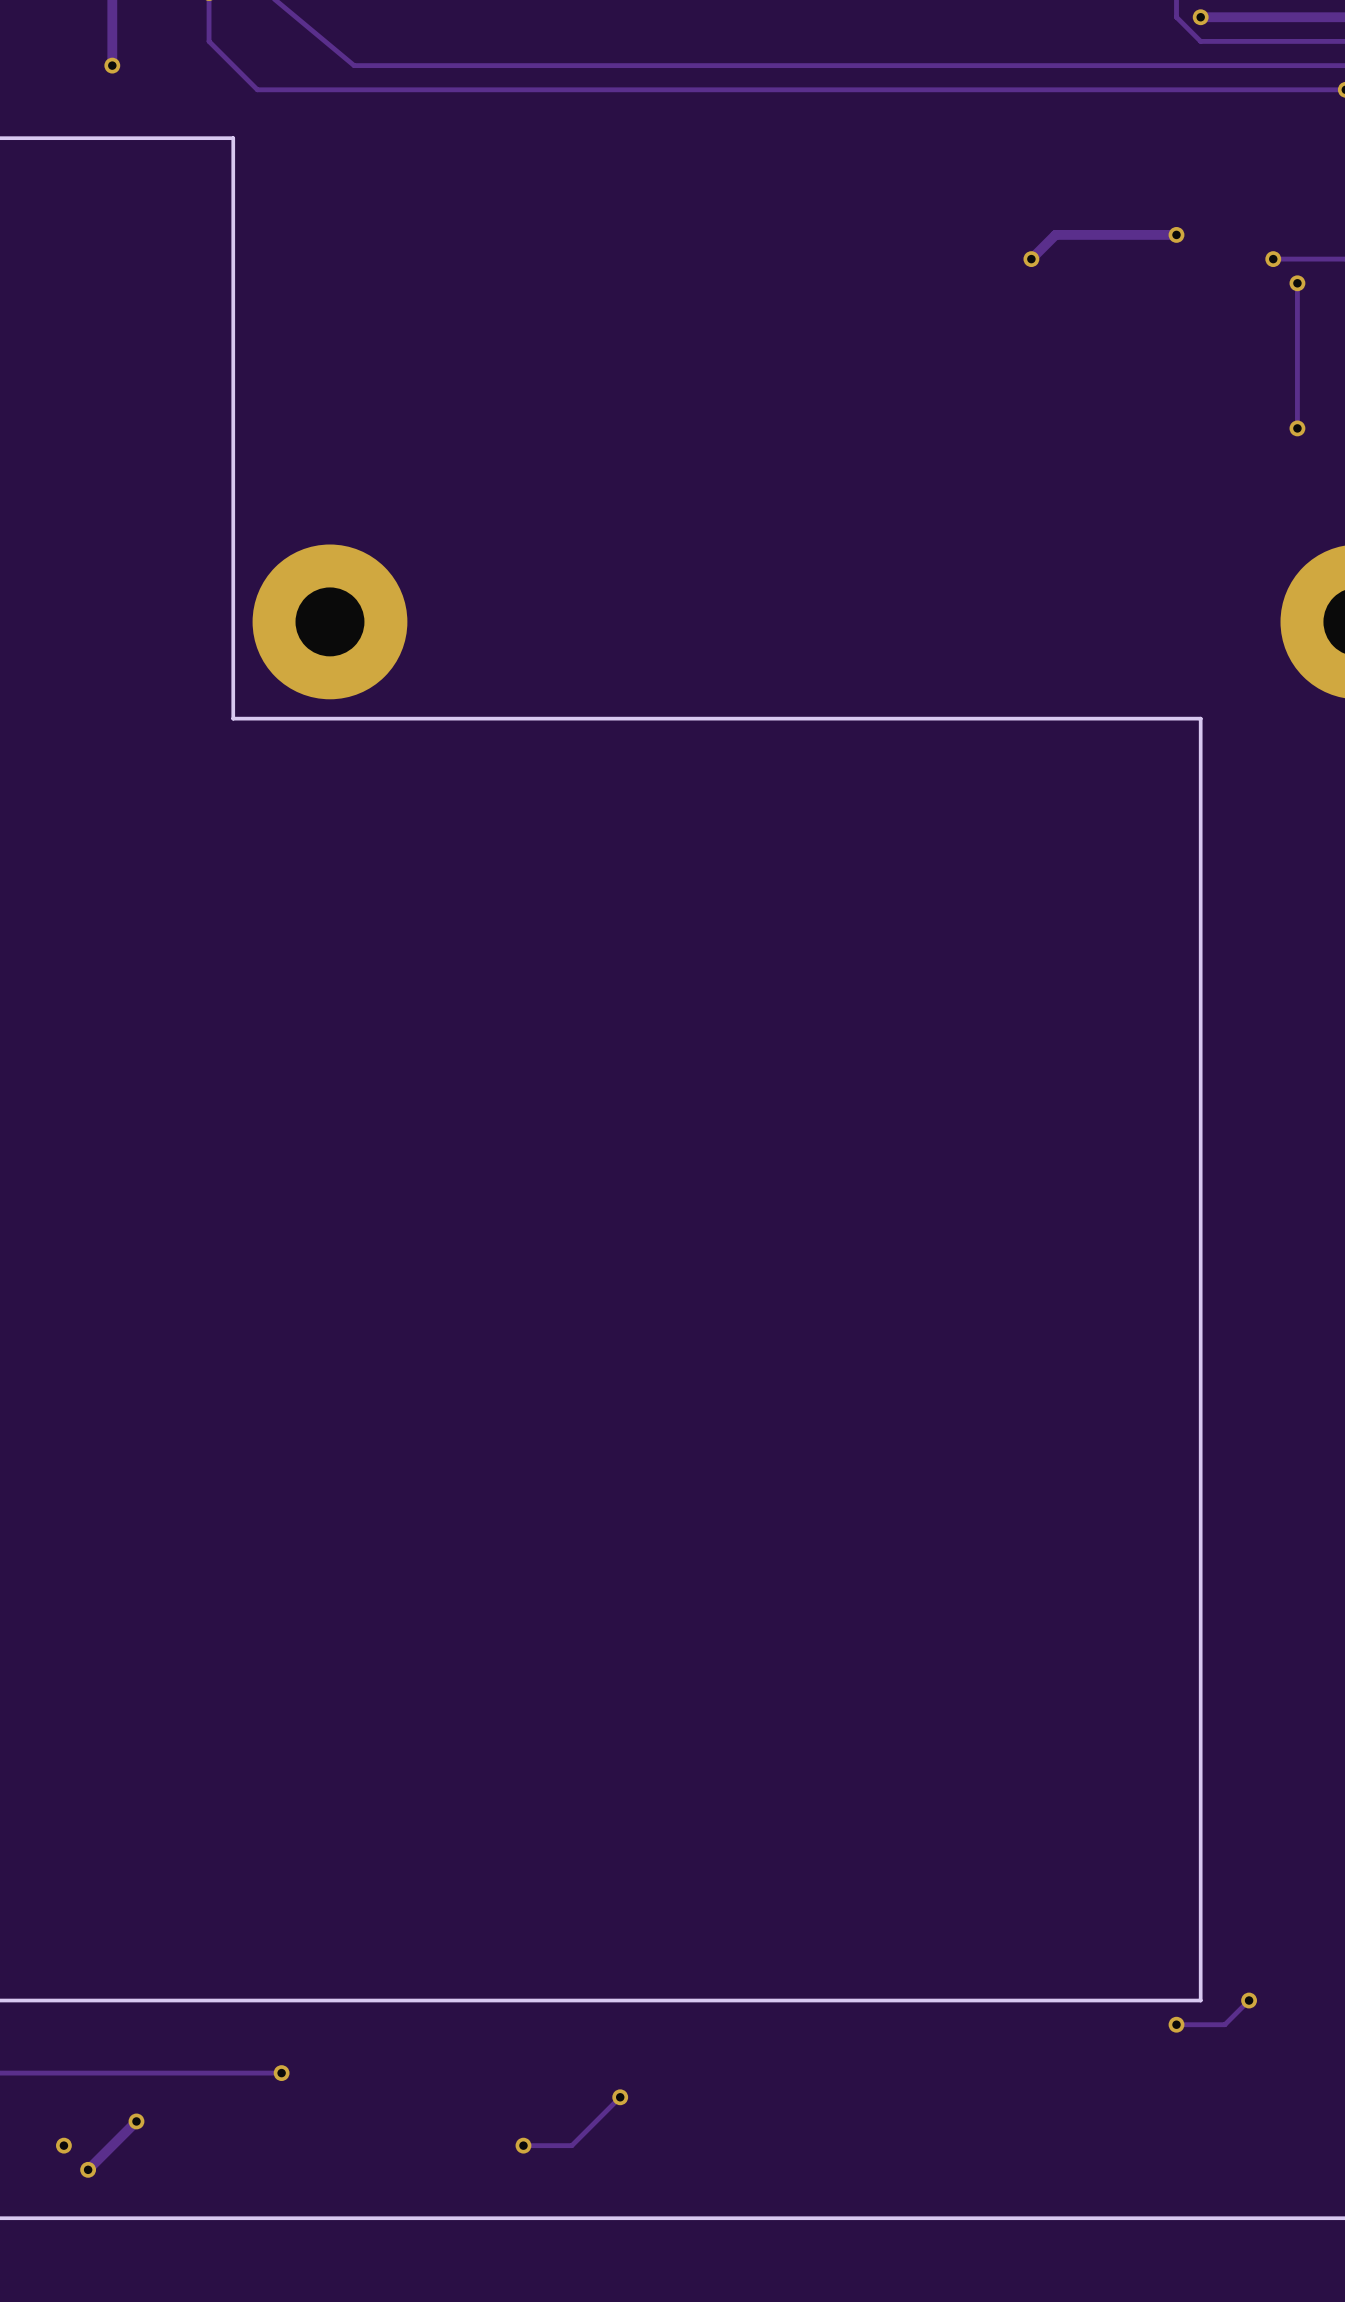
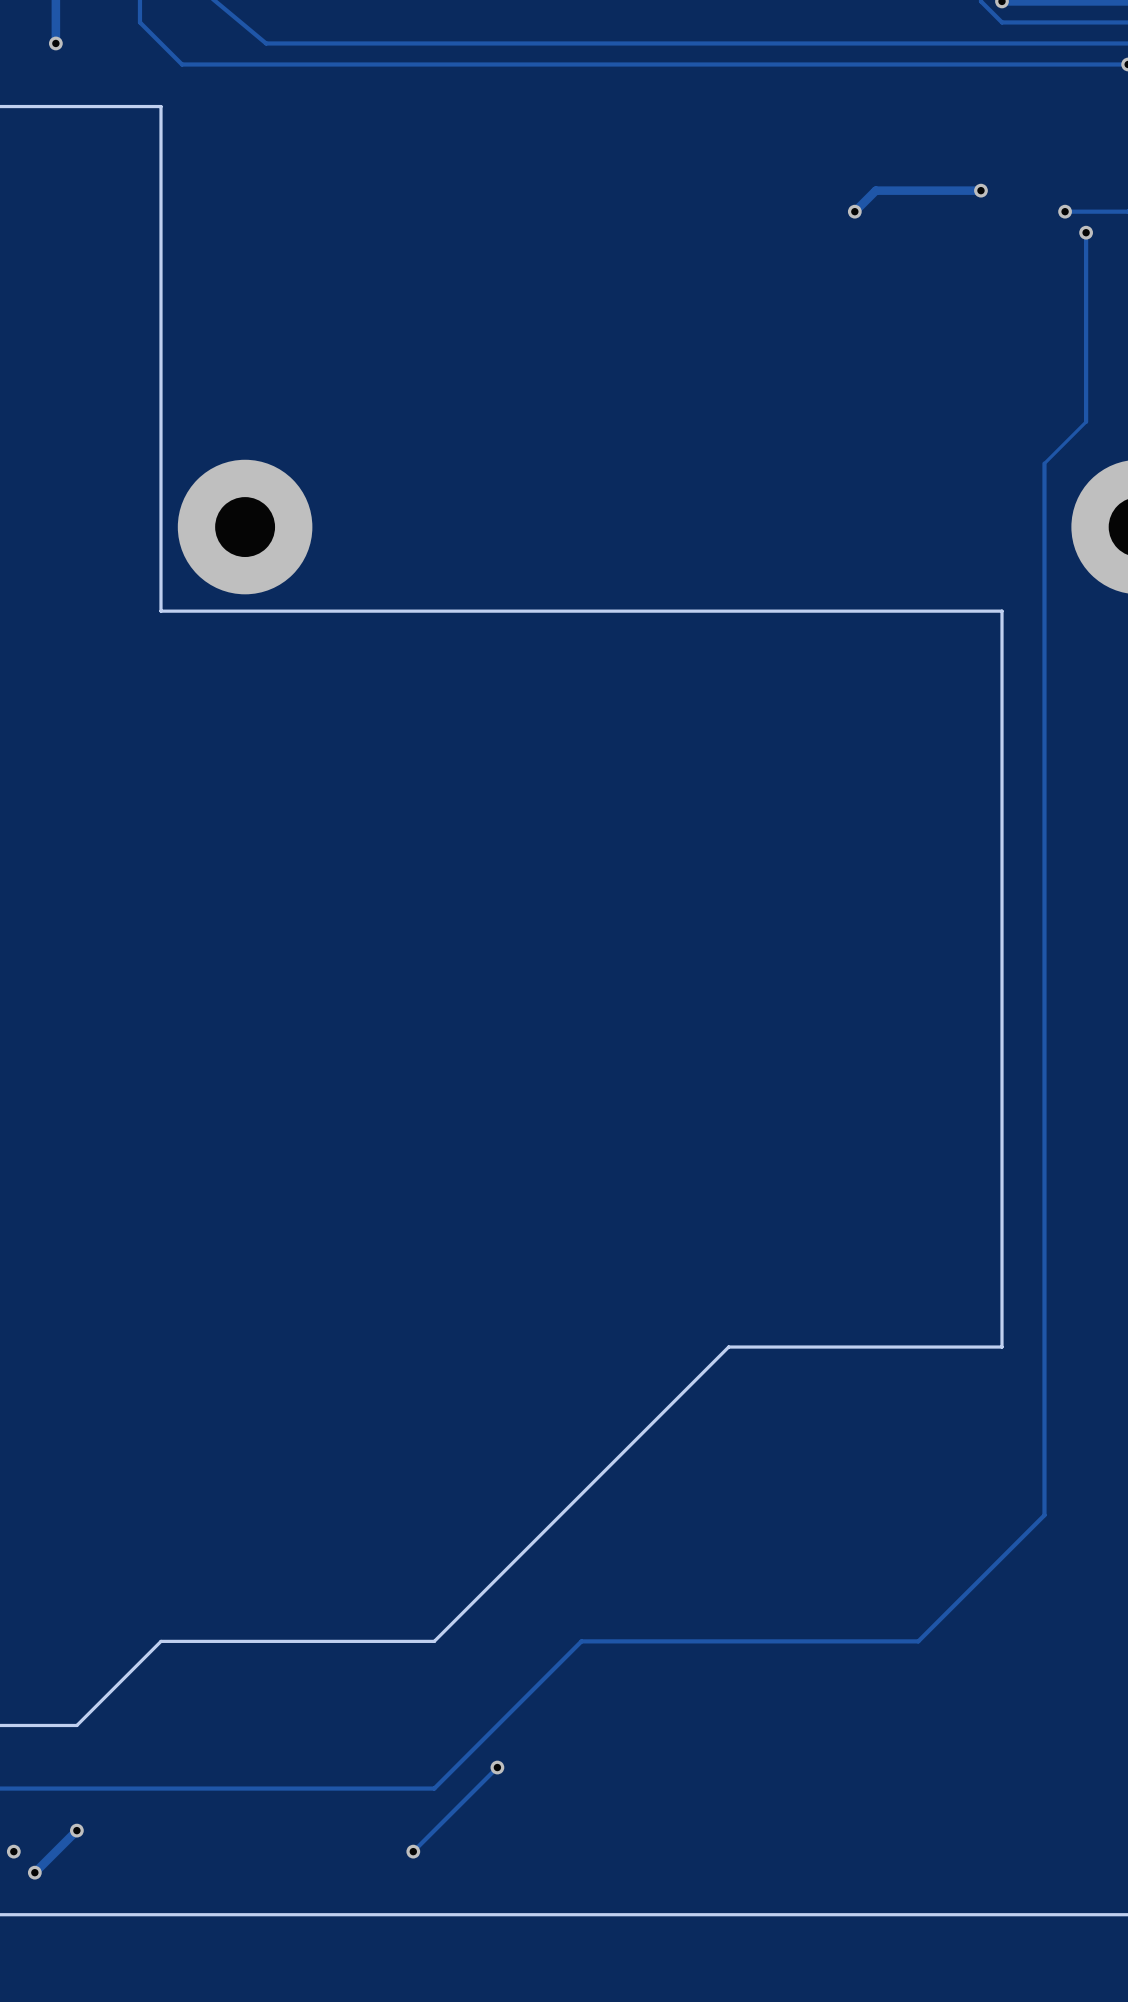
track: none -> (1086, 358) (1086, 421) (1044, 463) (1044, 1515) (918, 1641) (581, 1641) (434, 1788) (203, 1788)
via: (1297, 428) -> none
board edge: (1200, 1565) (1200, 2000) (136, 2000) -> (1002, 1347) (728, 1347) (434, 1641) (160, 1641) (76, 1725)
track: (1249, 2000) (1224, 2024) (1176, 2024) -> none
via: (1249, 2000) -> none
via: (1176, 2024) -> none
via: (281, 2073) -> none
track: (620, 2097) (571, 2145) (523, 2145) -> (497, 1767) (413, 1851)
via position: (620, 2097) -> (497, 1767)

